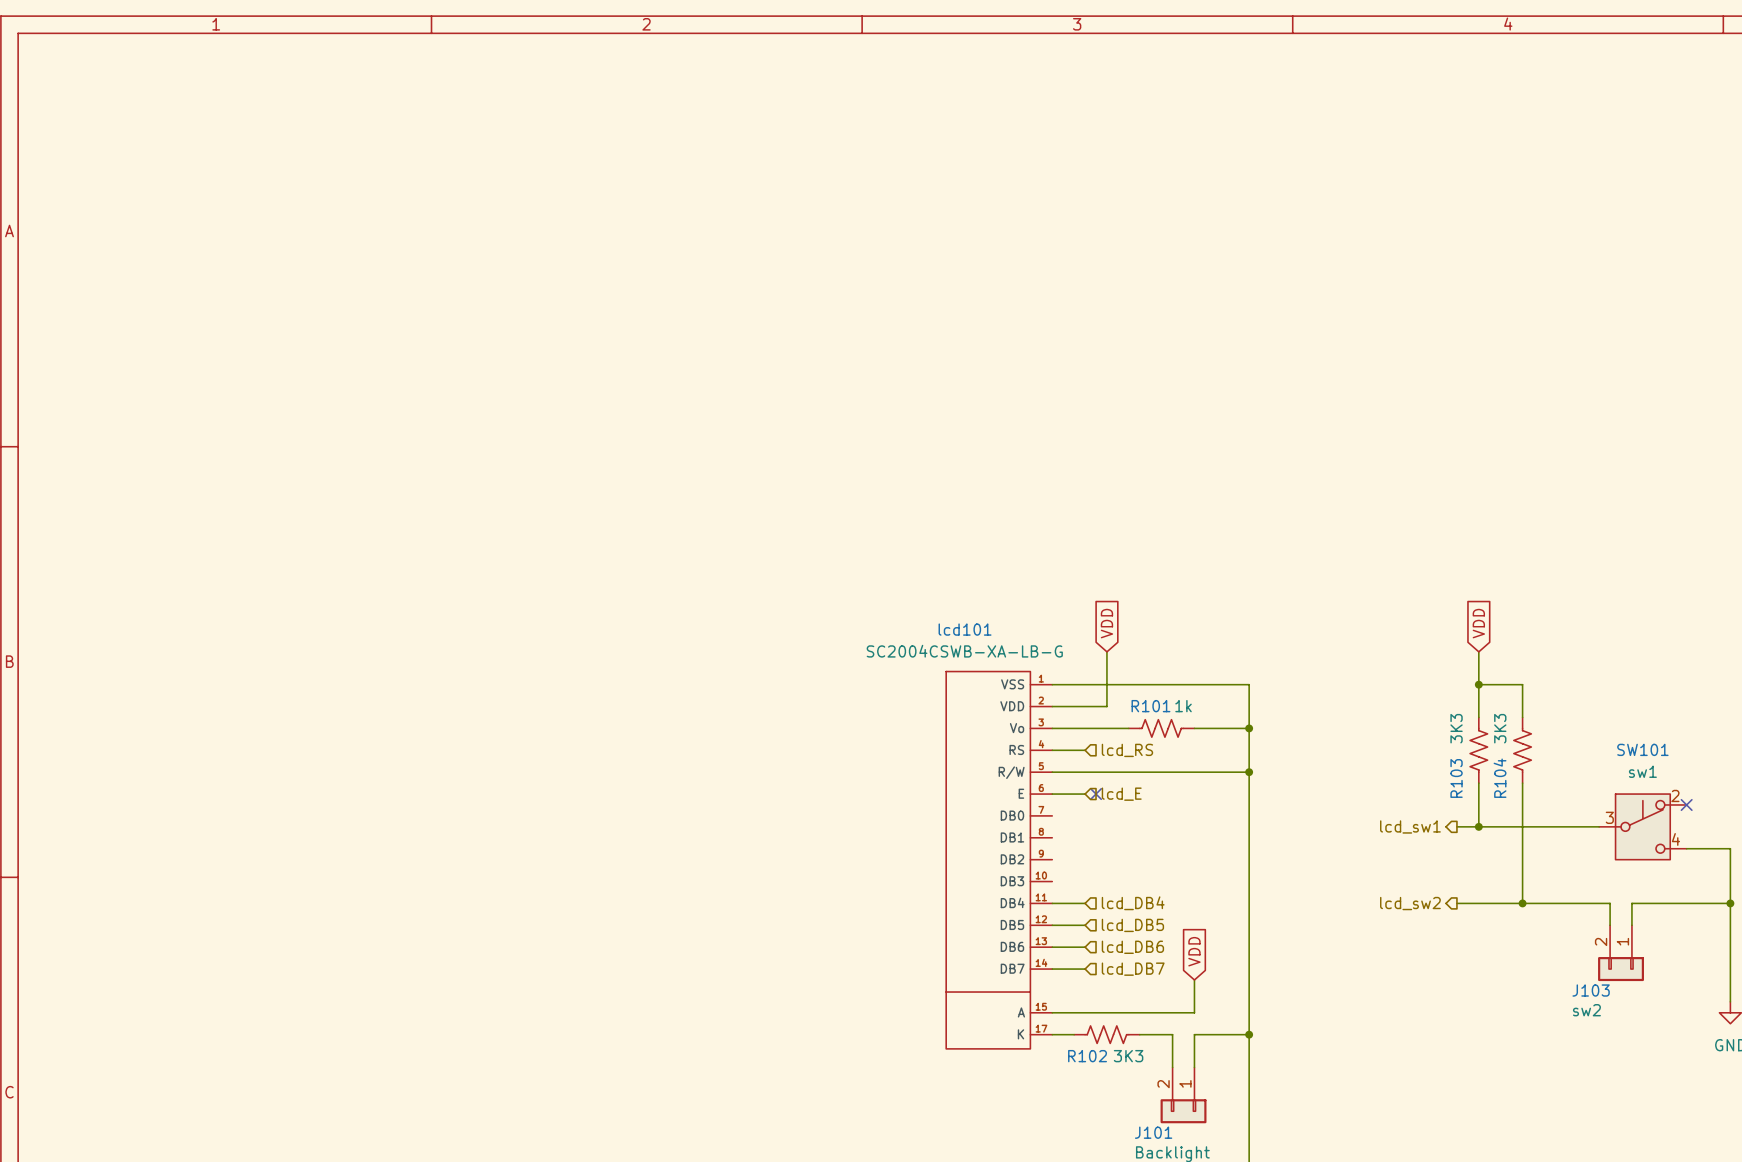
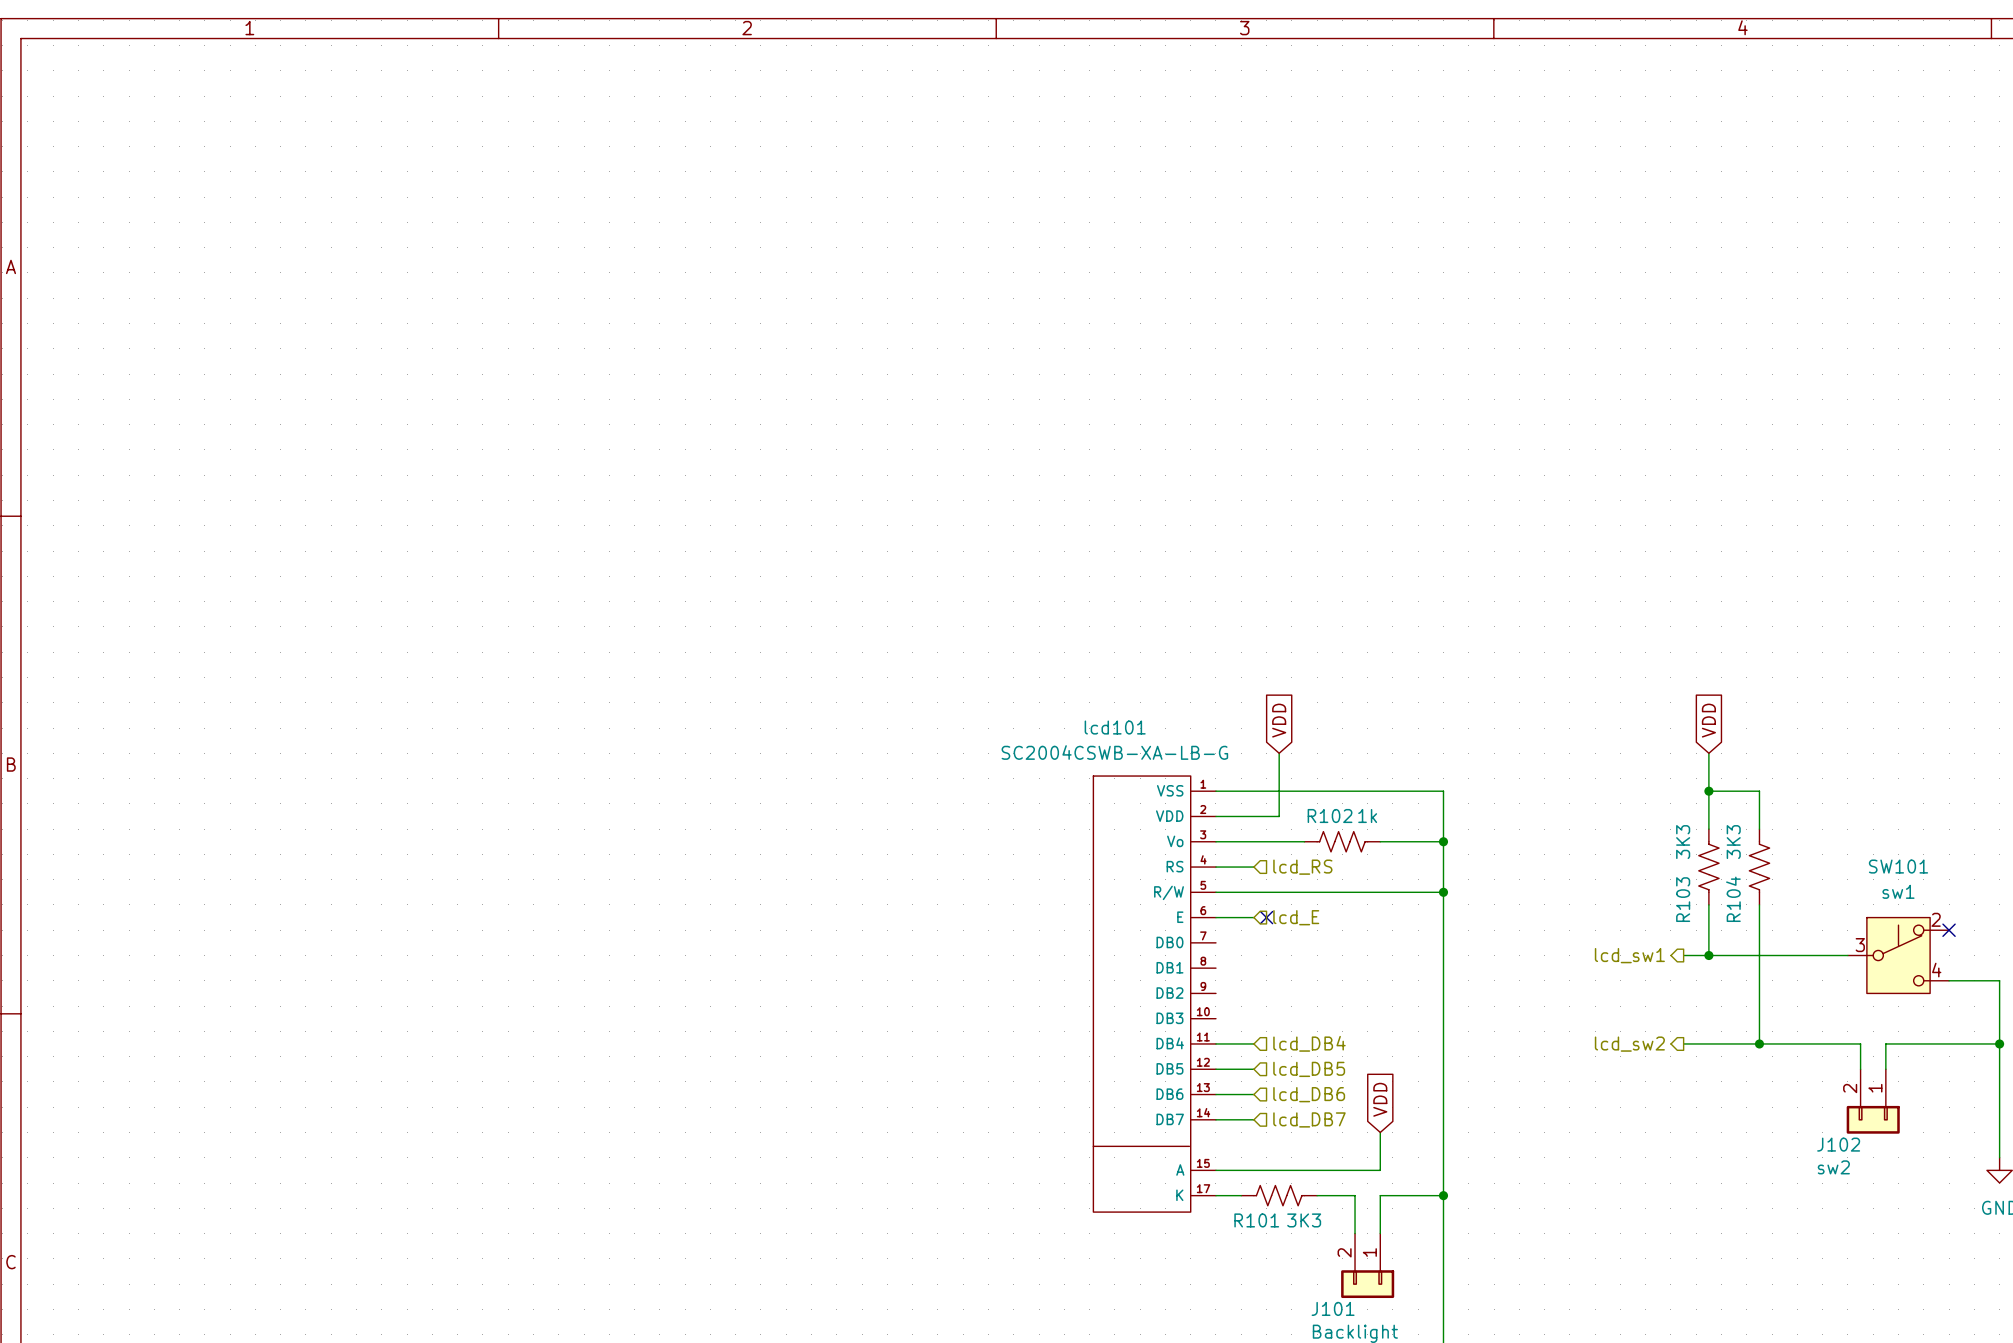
R101 name: R101 (1150, 706) -> R102 (1330, 816)
J103 name: J103 (1591, 990) -> J102 (1838, 1144)
R102 name: R102 (1087, 1056) -> R101 (1256, 1220)

